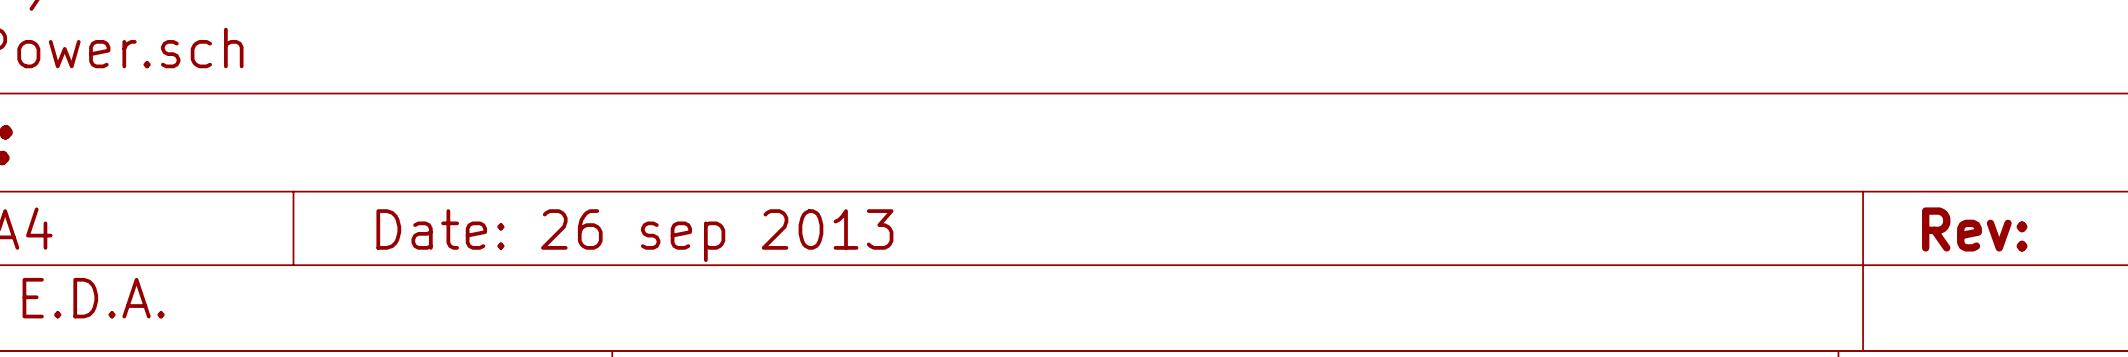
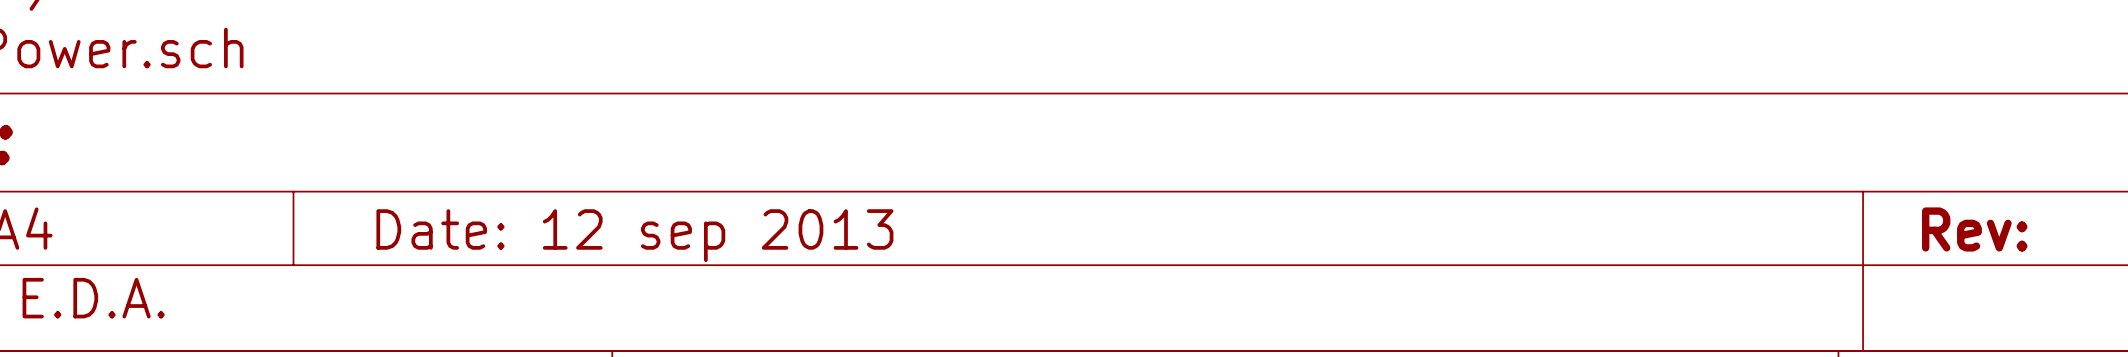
title block: Date: 26 sep 2013 (634, 235) -> Date: 12 sep 2013 (634, 235)

